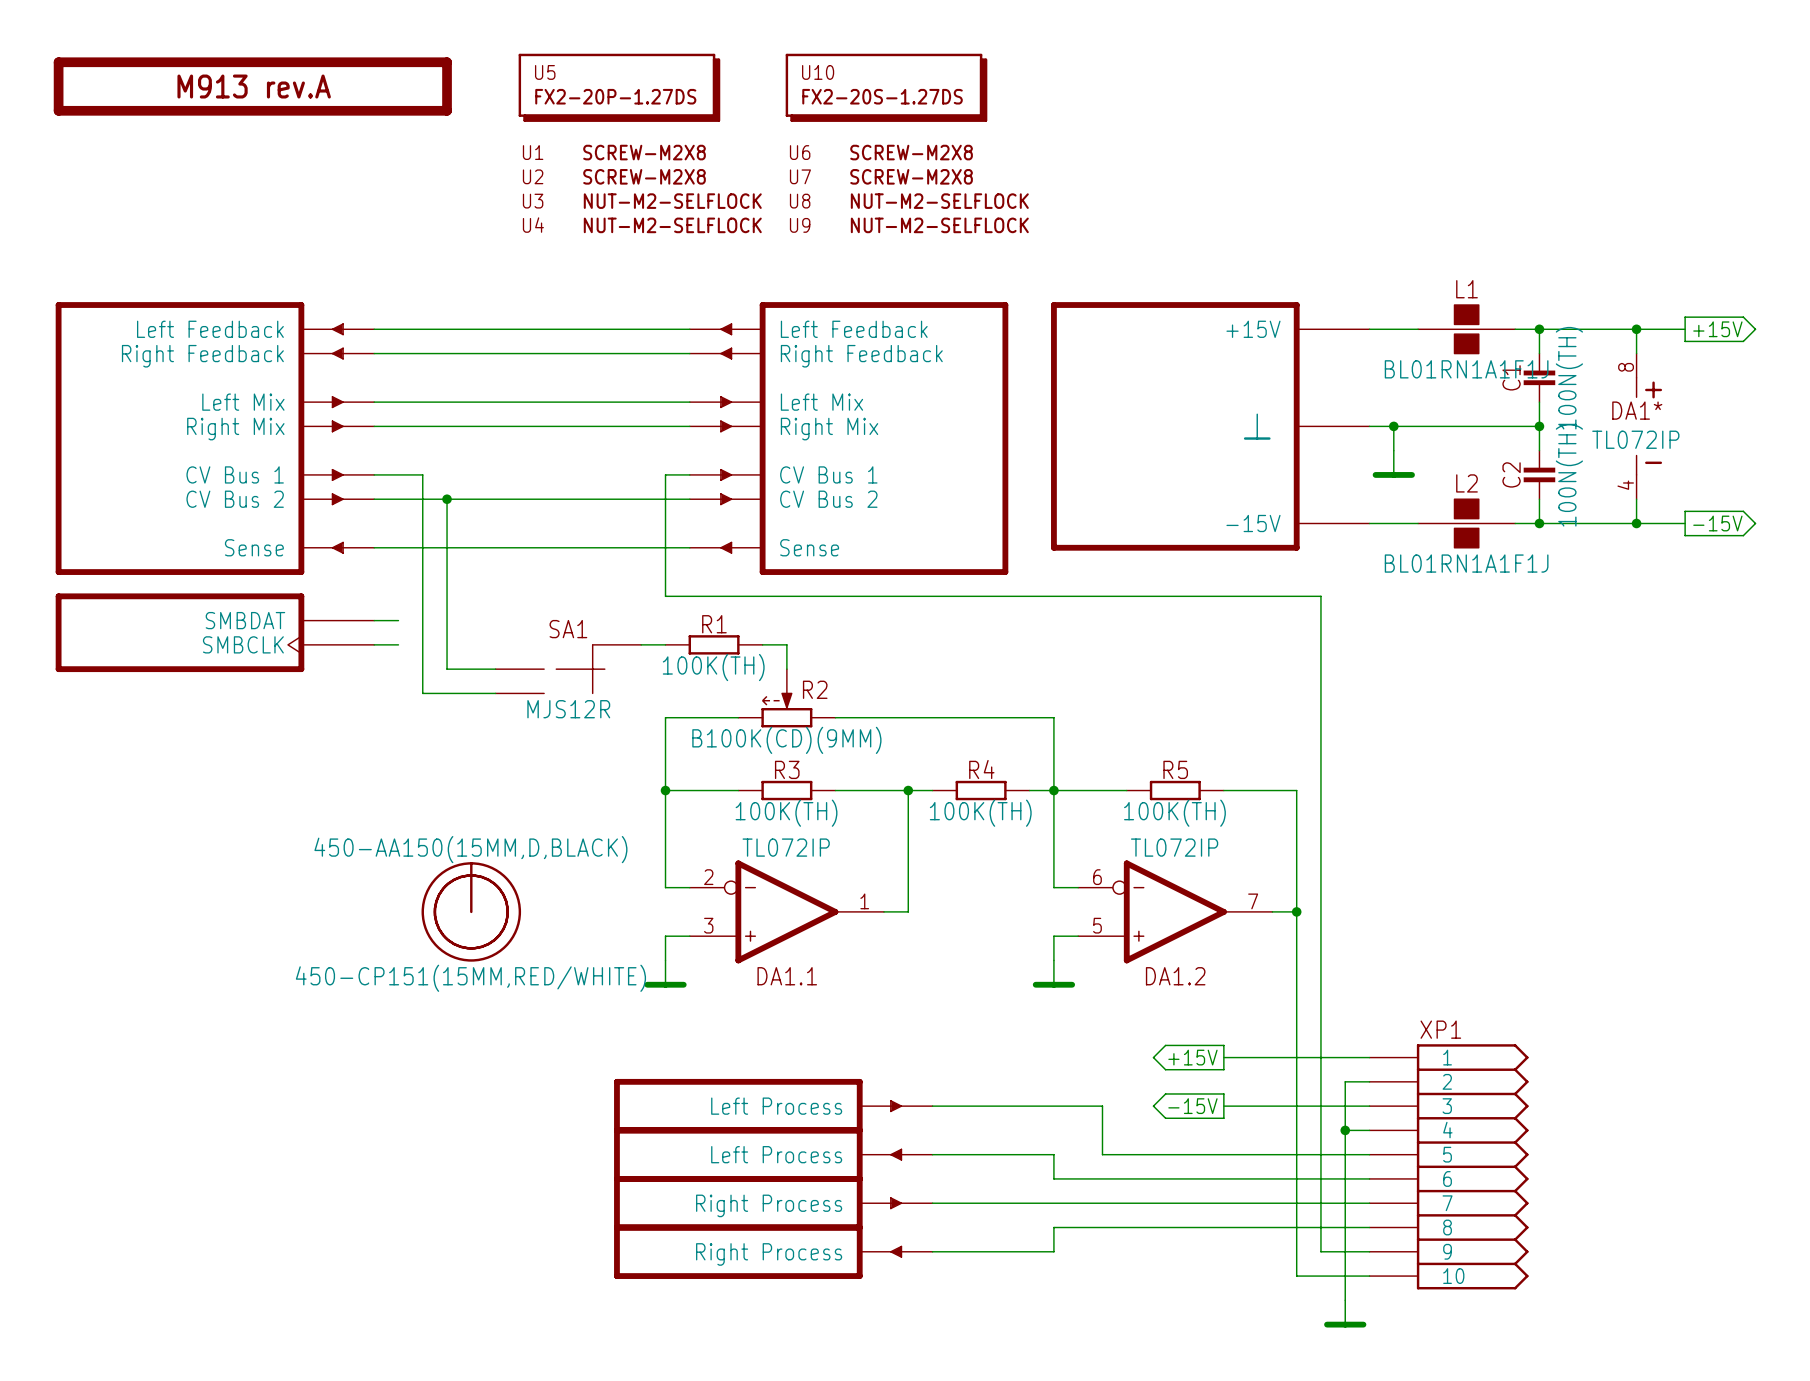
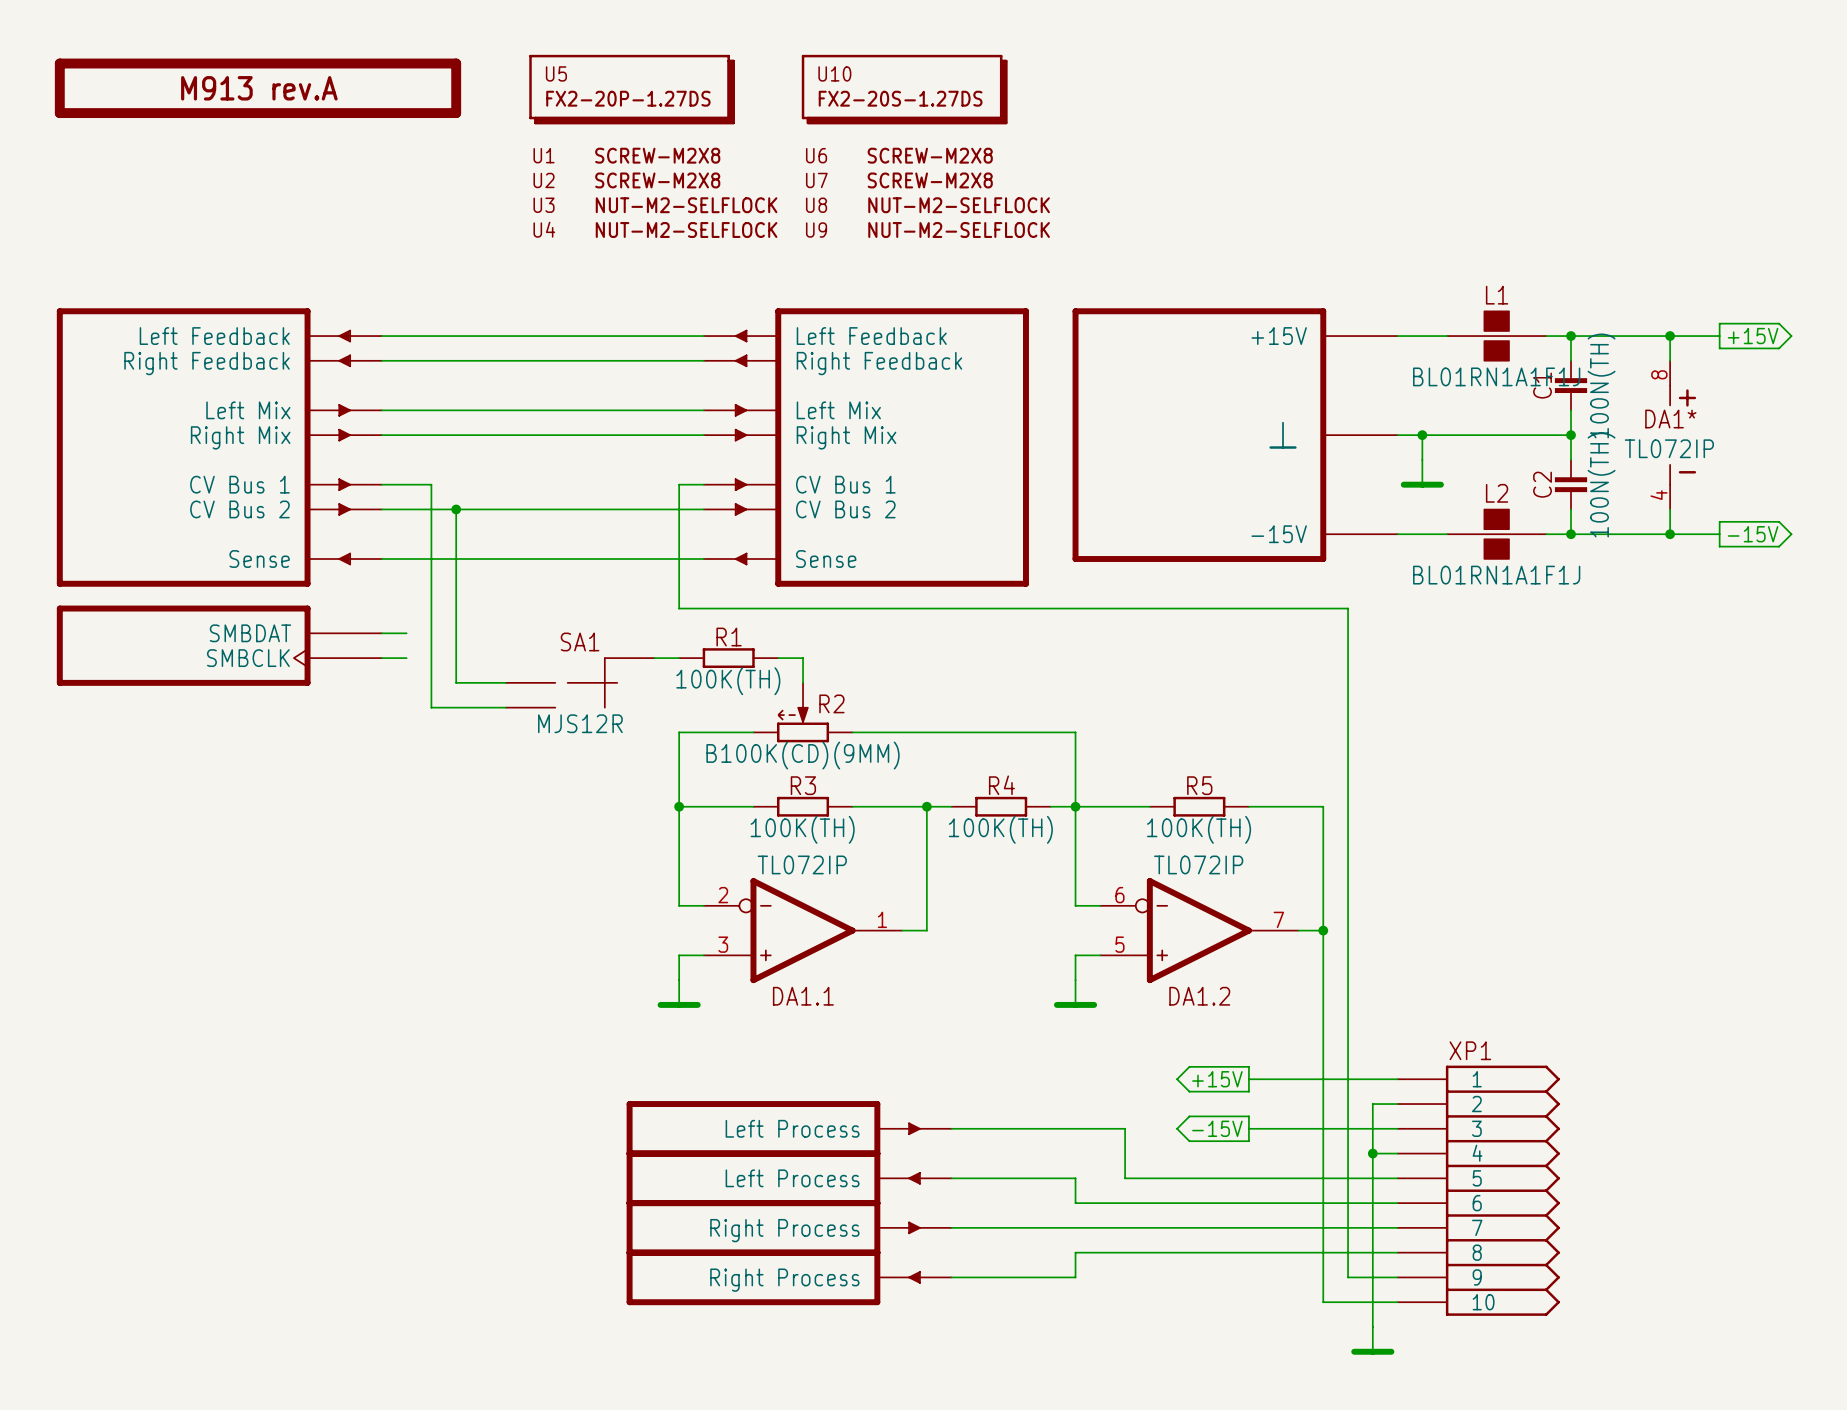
part: 450-AA150(15MM,D,BLACK) (471, 911) -> none
part: 450-CP151(15MM,RED/WHITE) (471, 911) -> none

